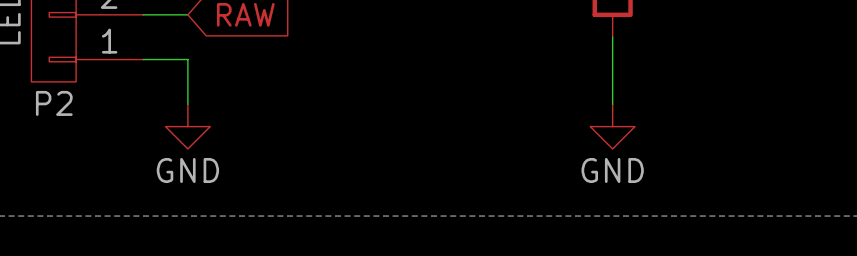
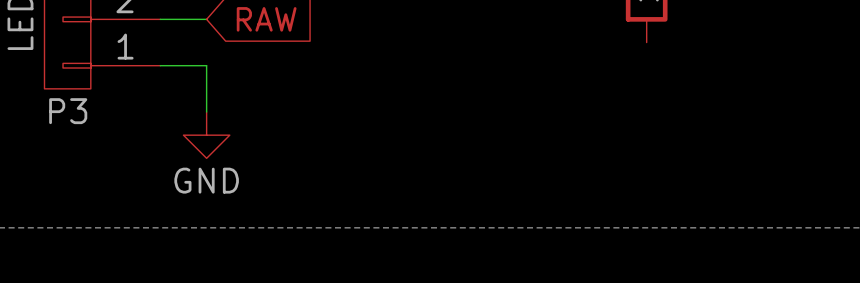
wire: (612, 37) (612, 104) -> none
P2 name: P2 (54, 103) -> P3 (68, 111)
power symbol: GND (612, 126) -> none

